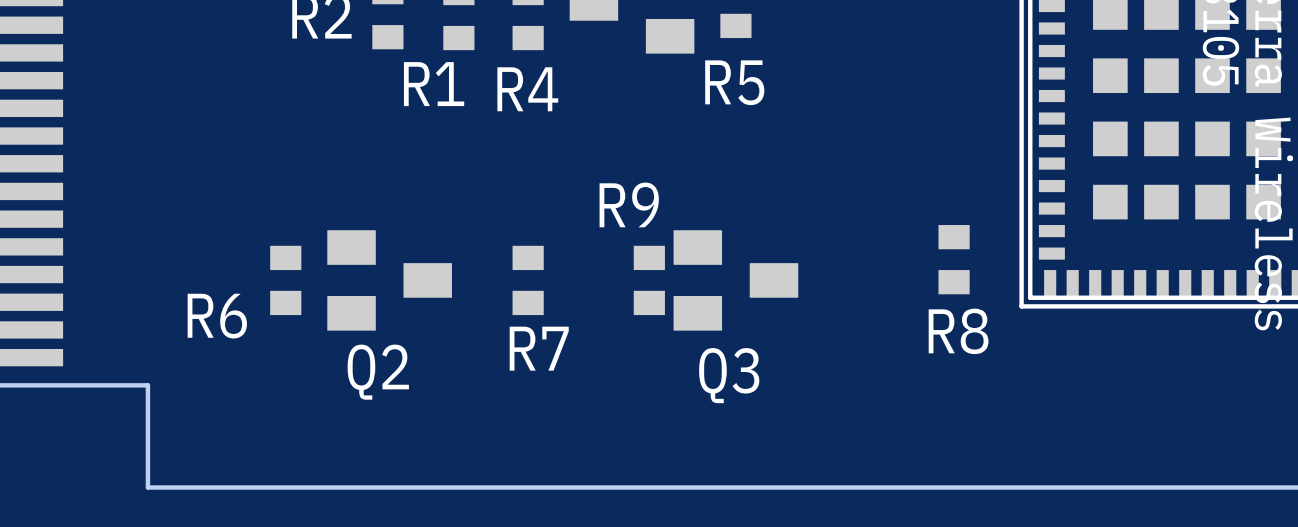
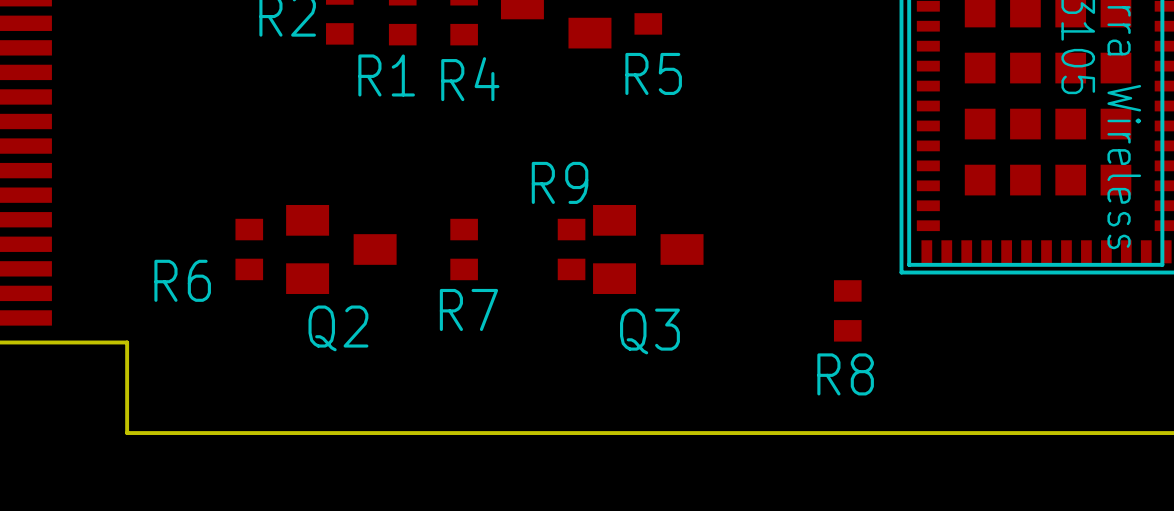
R8 position: (954, 259) -> (847, 310)

